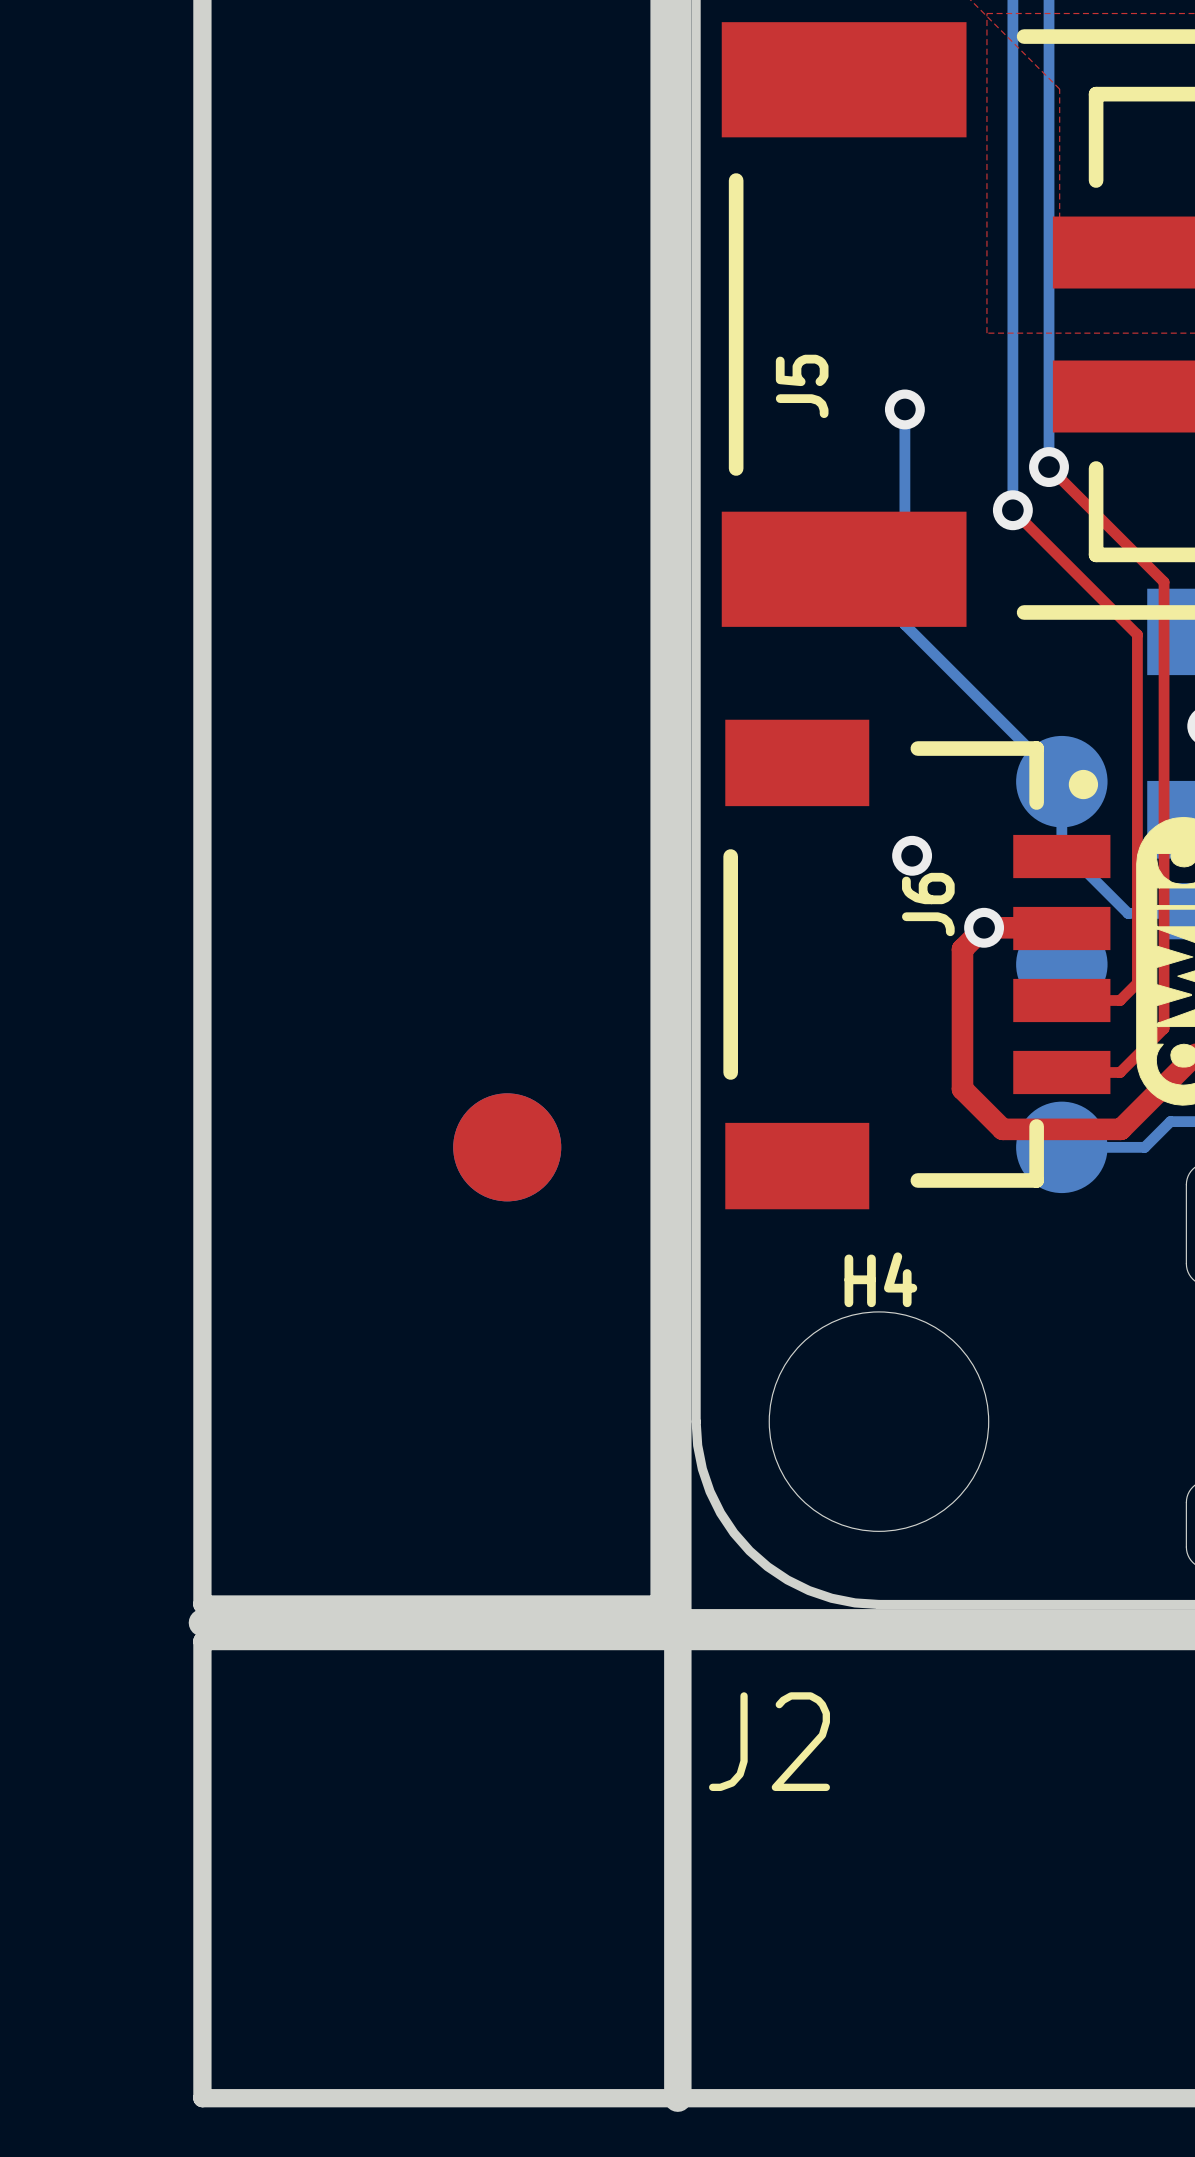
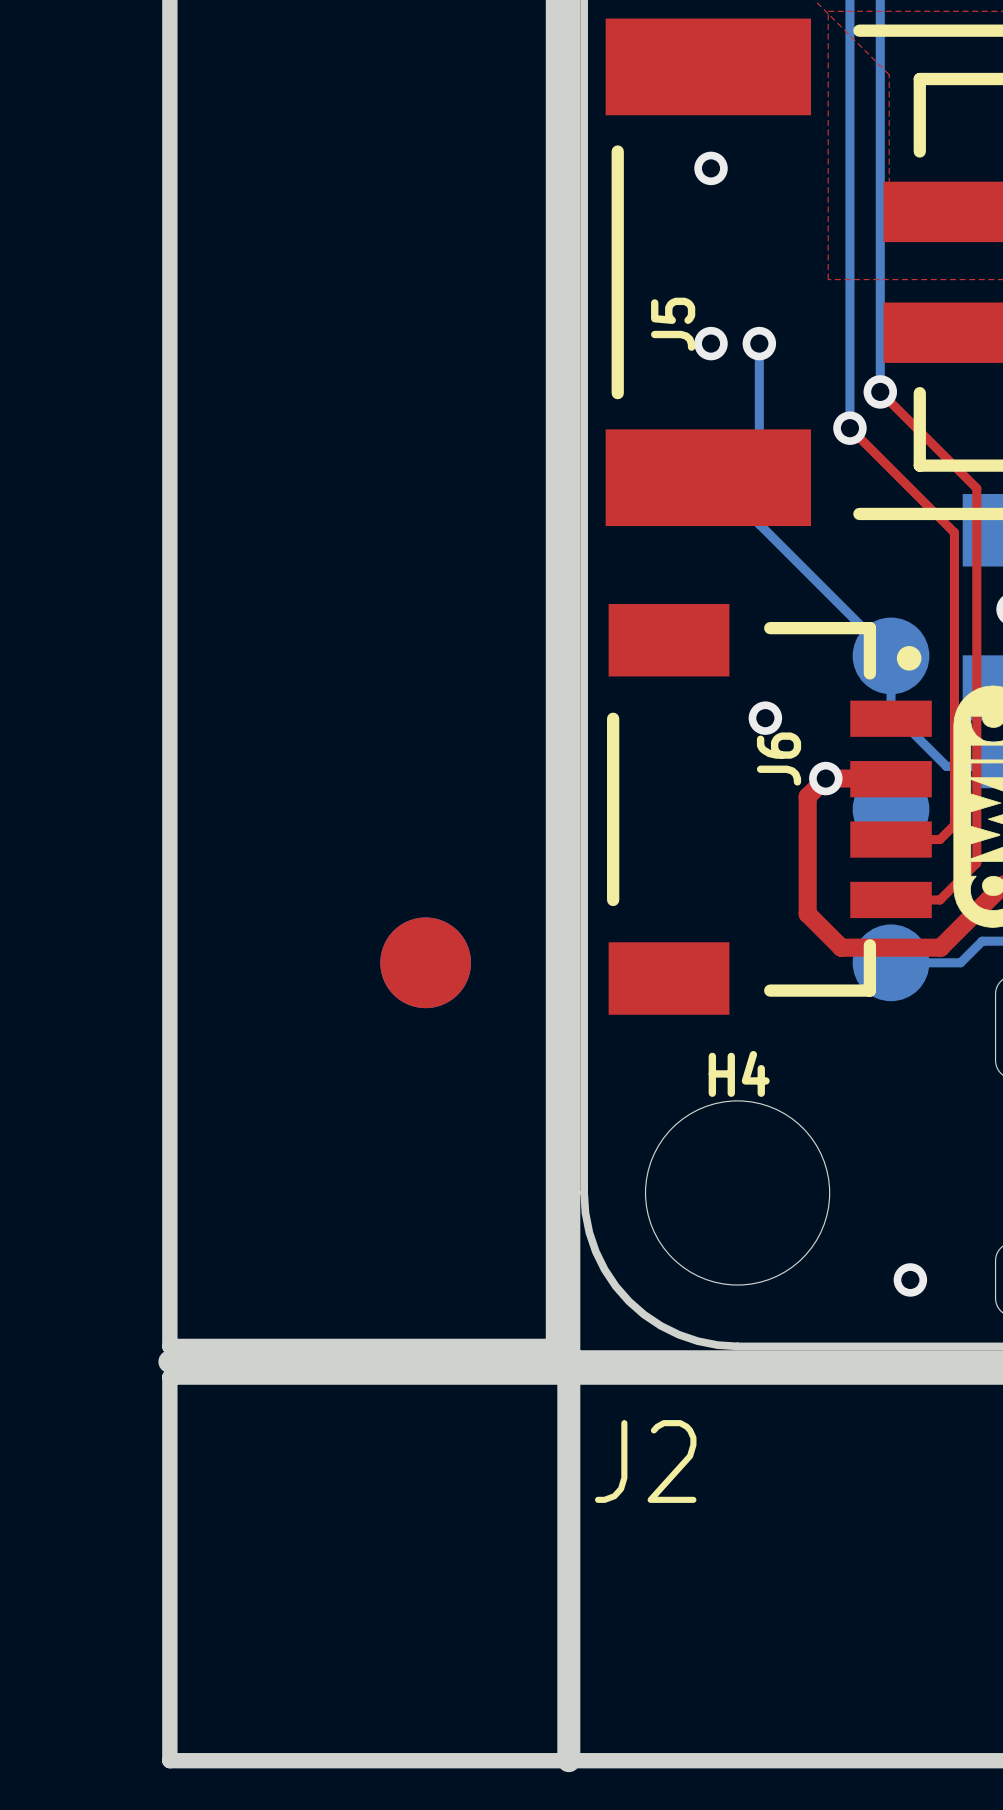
via: none -> (711, 168)
via: none -> (711, 343)
via: none -> (910, 1279)

